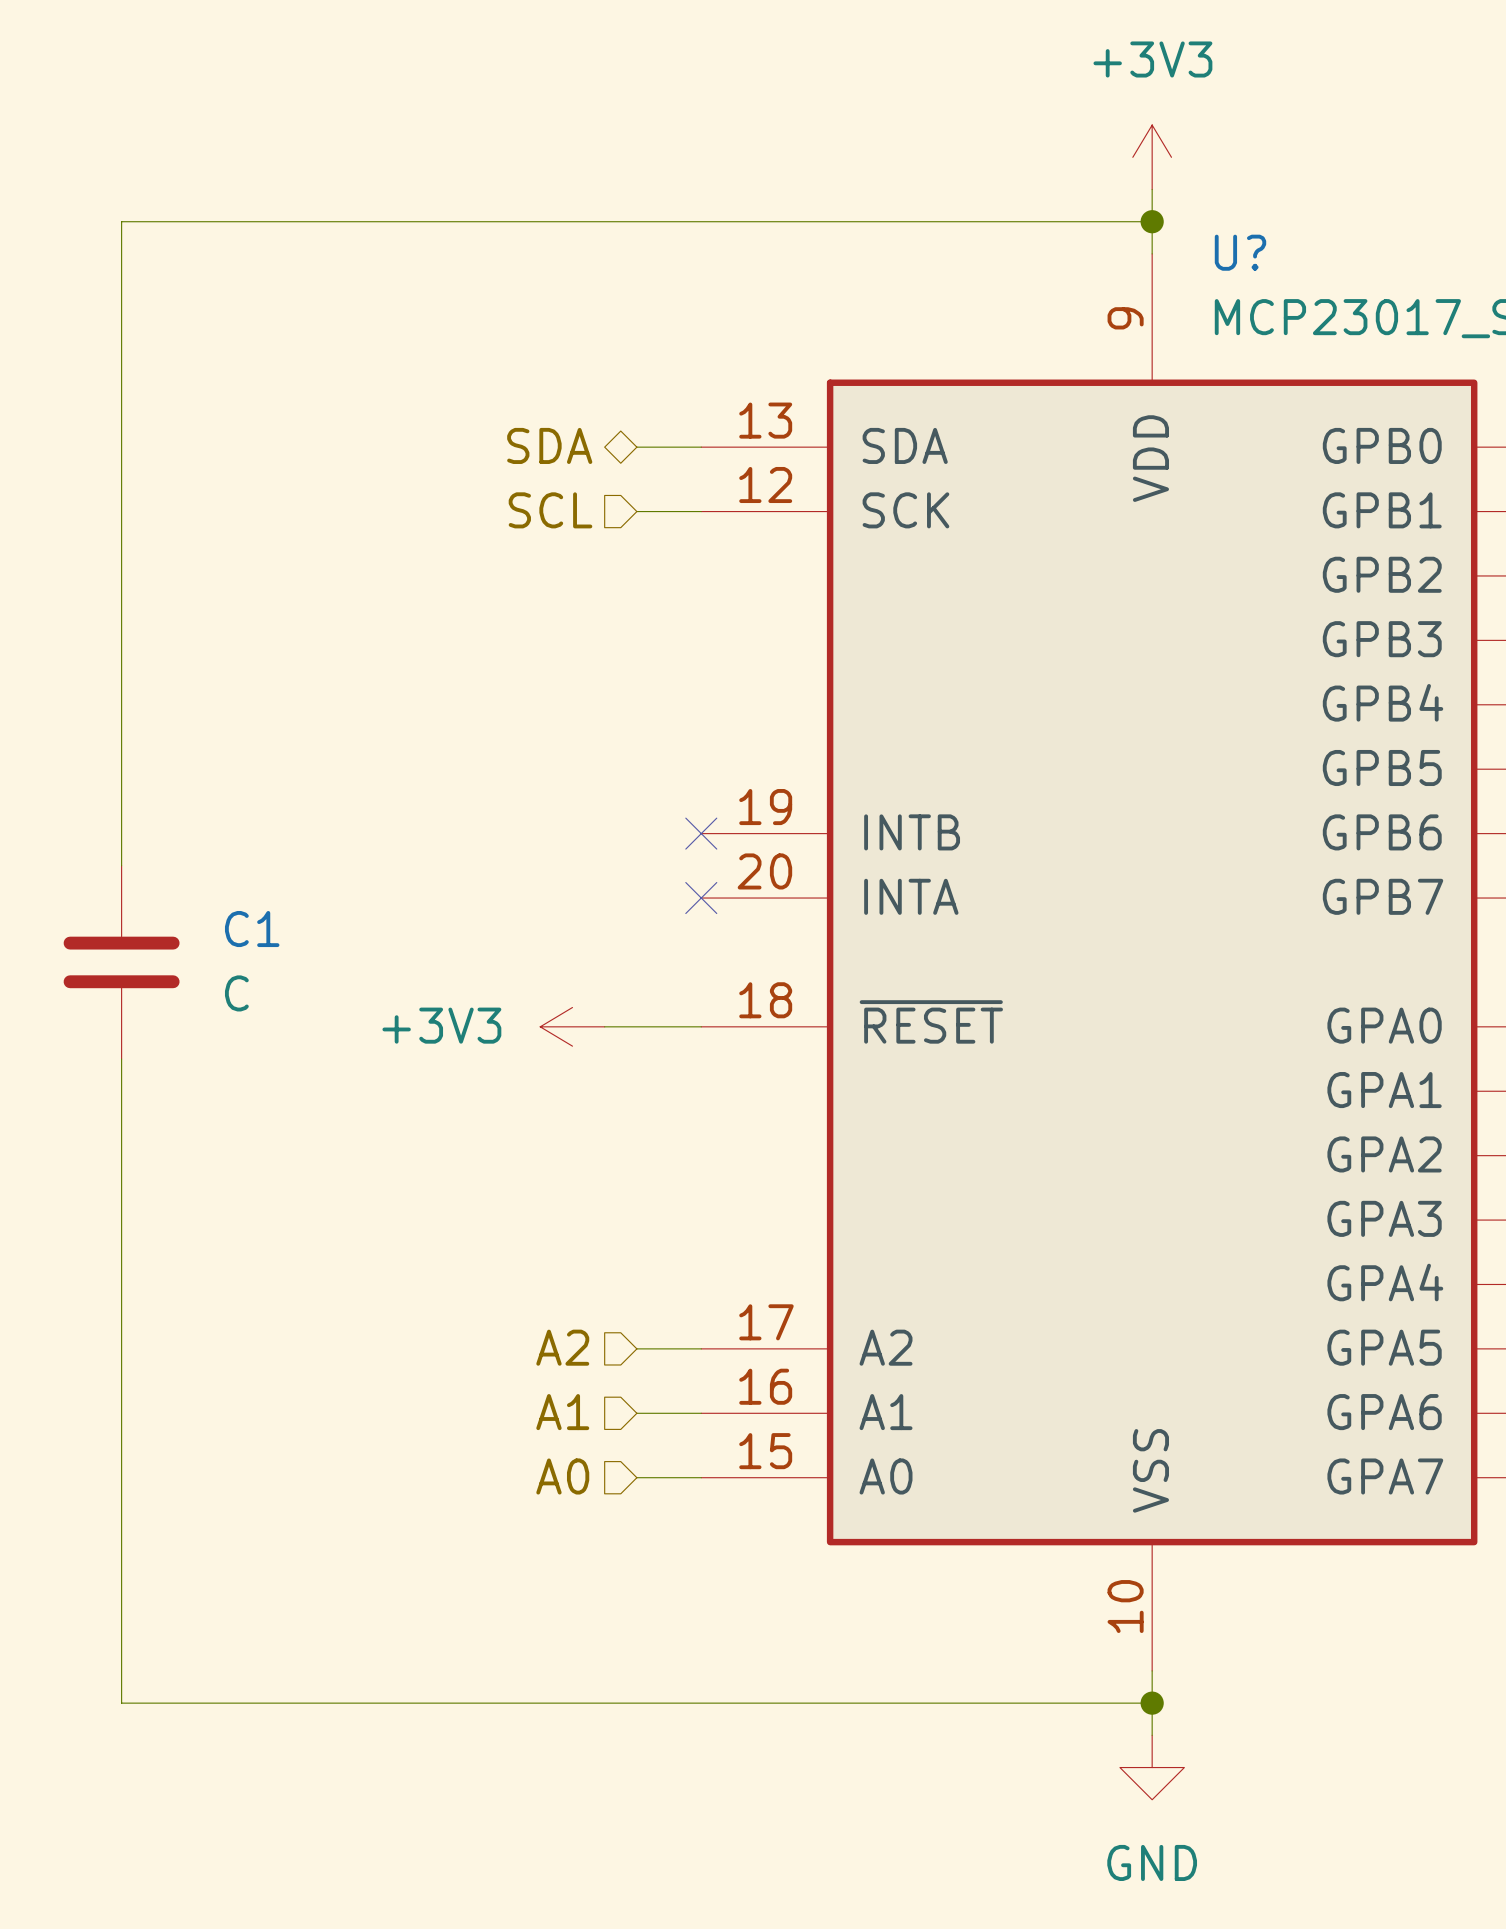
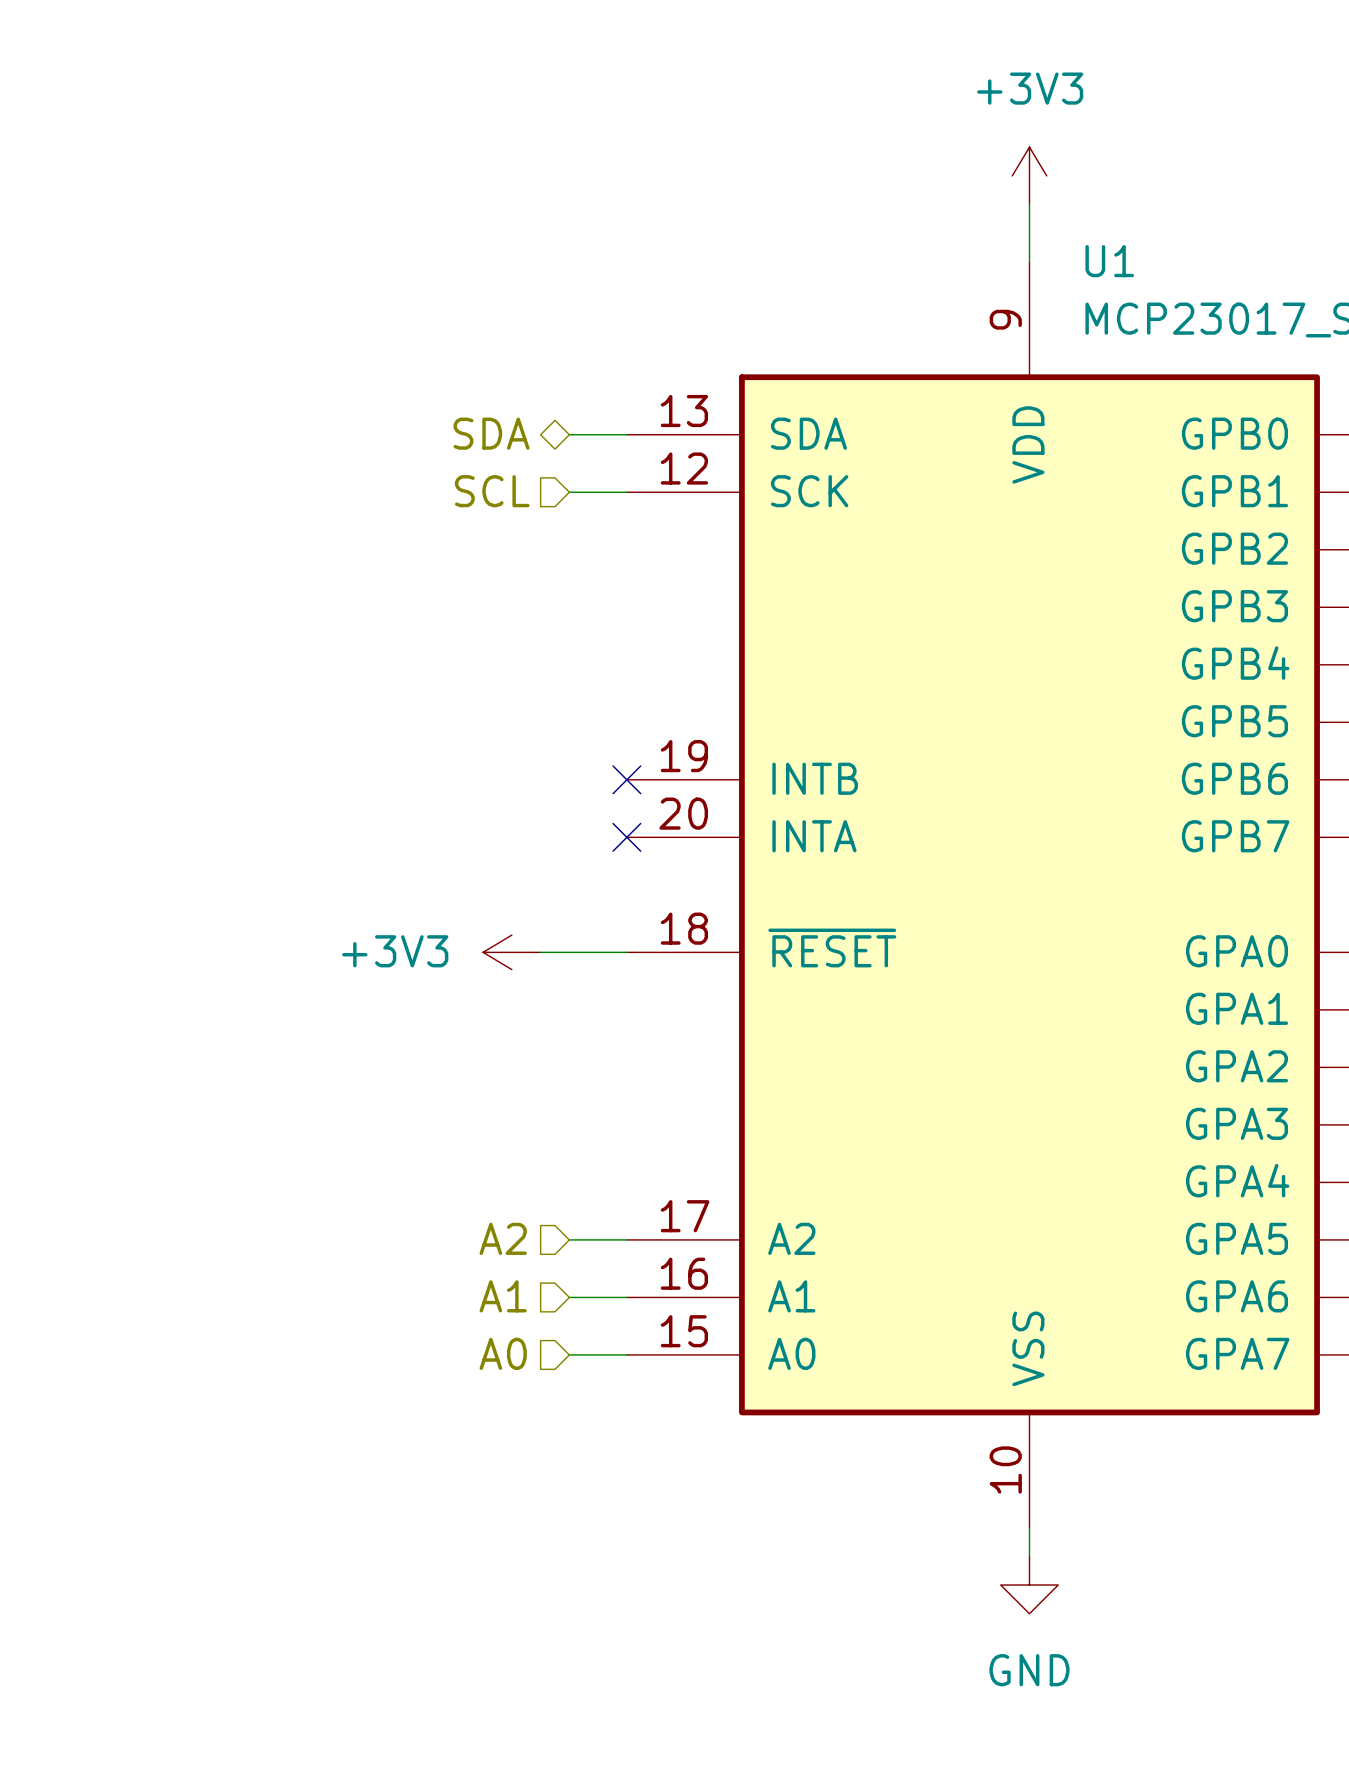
wire: (1152, 221) (121, 221) (121, 865) -> none
junction: (1152, 221) -> none
U? name: U? (1240, 252) -> U1 (1109, 261)
C1: C (121, 962) -> none
wire: (121, 1059) (121, 1703) (1152, 1703) (1152, 1735) -> none
junction: (1152, 1703) -> none
power symbol position: GND (1152, 1767) -> GND (1029, 1585)

